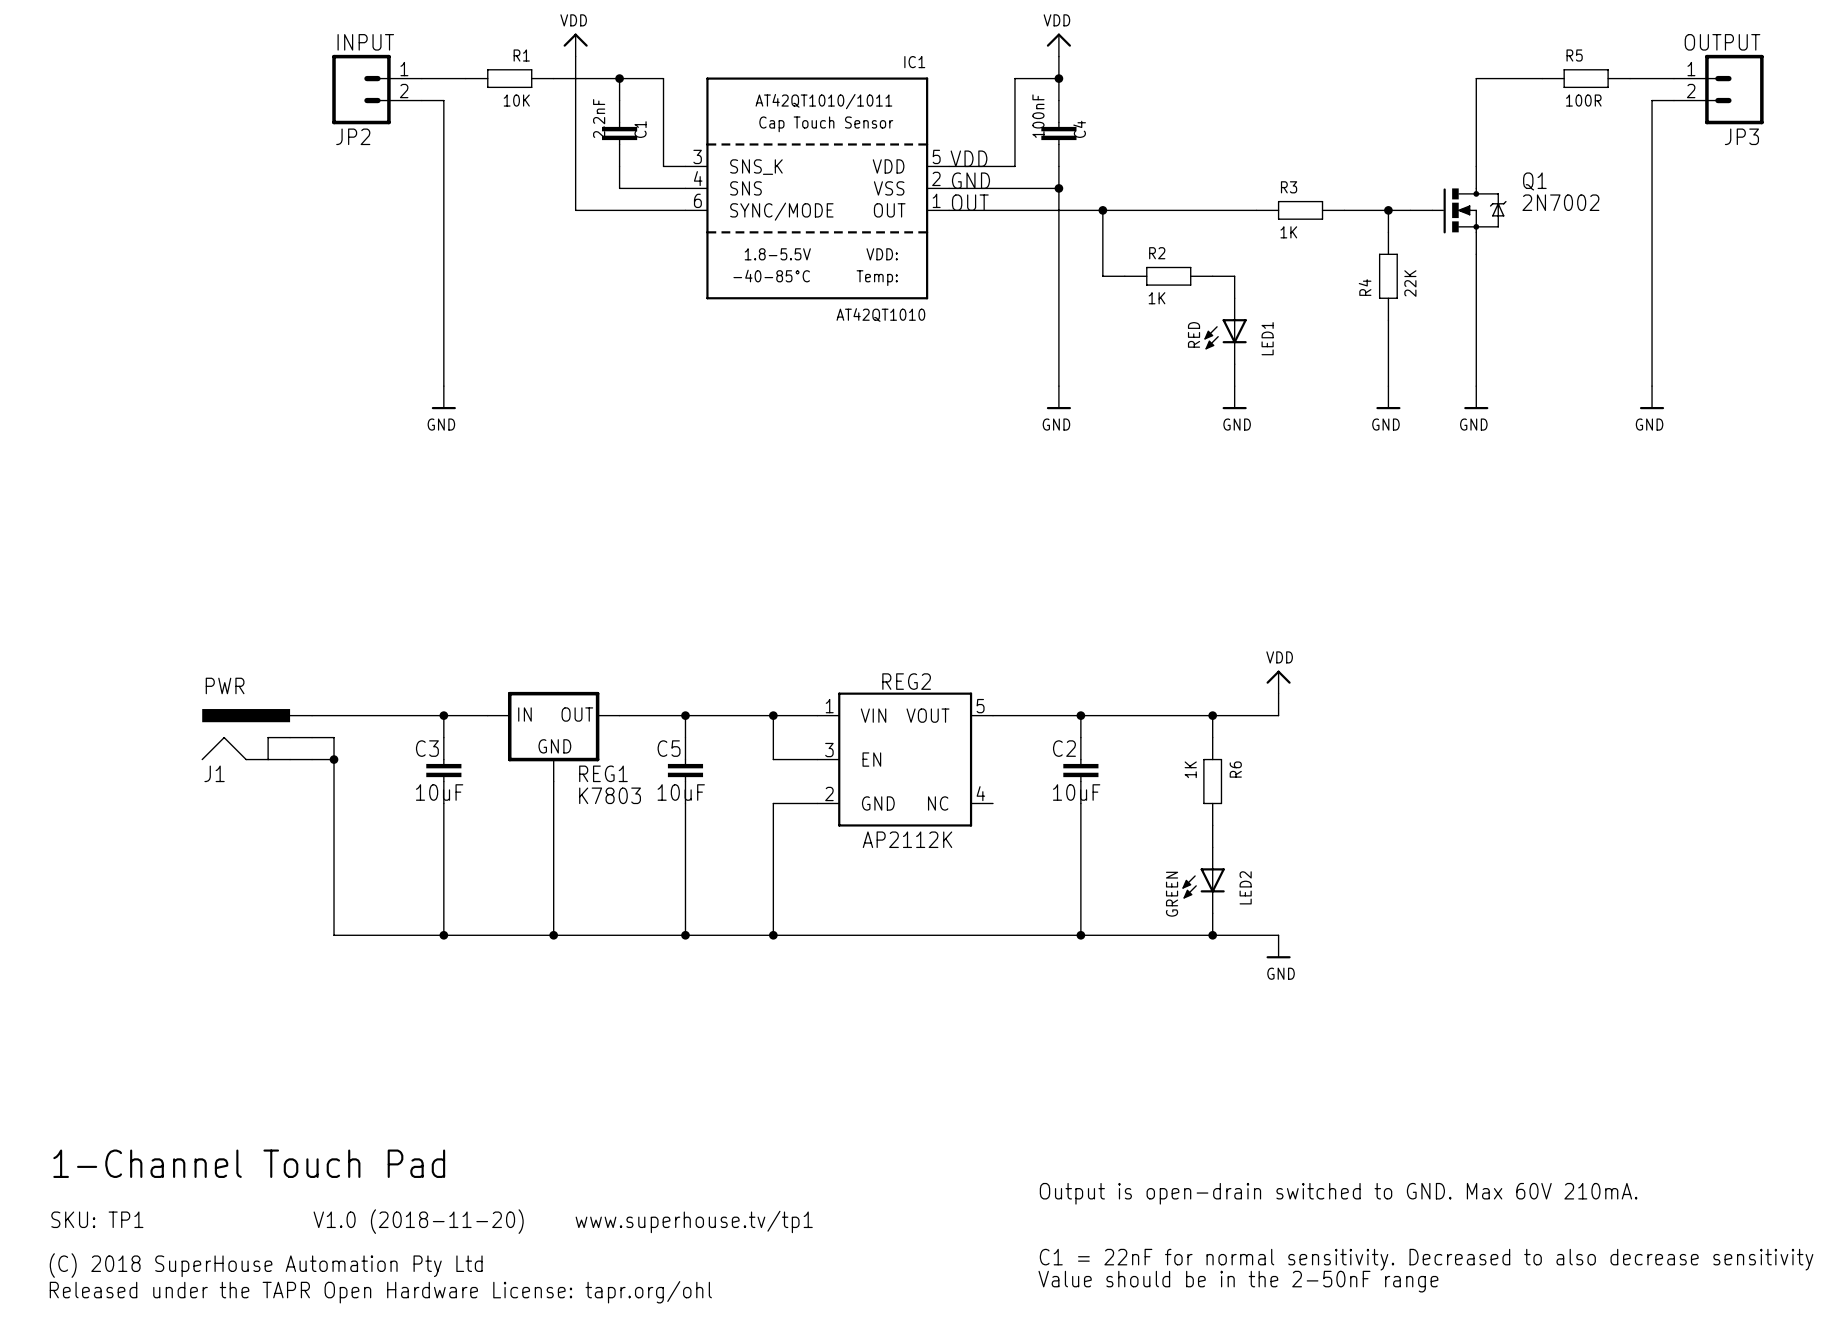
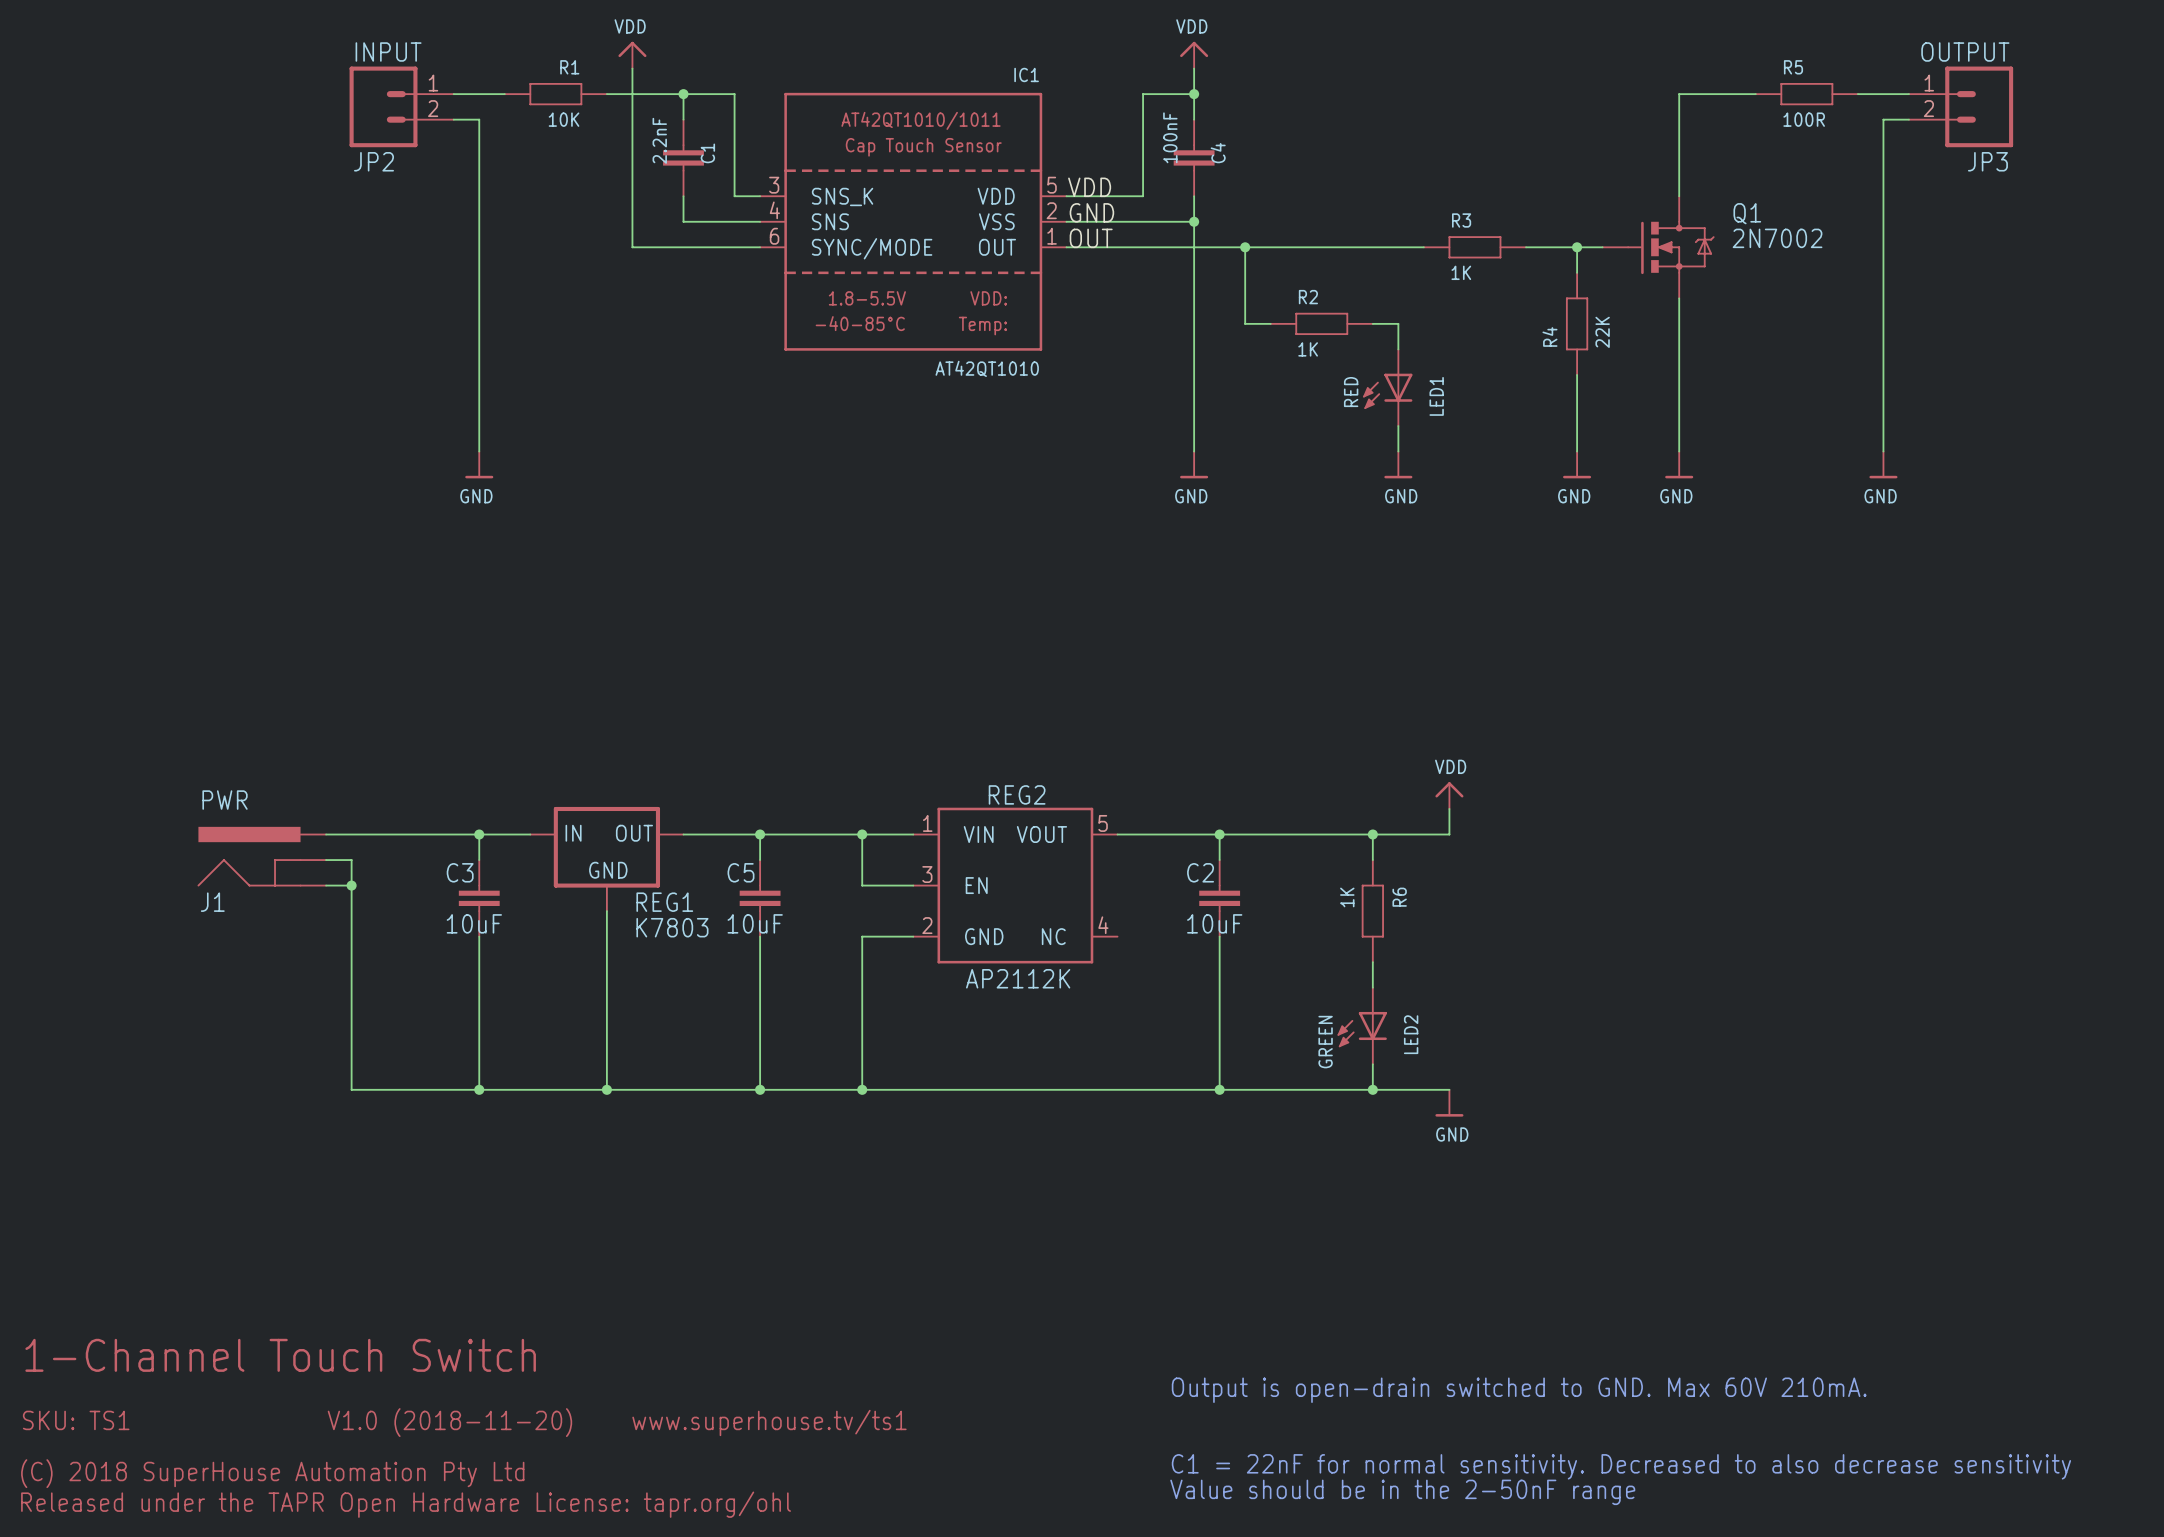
text: 1-Channel Touch Pad (249, 1163) -> 1-Channel Touch Switch (280, 1355)
text: SKU: TP1 (97, 1219) -> SKU: TS1 (76, 1420)
text: www.superhouse.tv/tp1 (694, 1221) -> www.superhouse.tv/ts1 (769, 1422)

